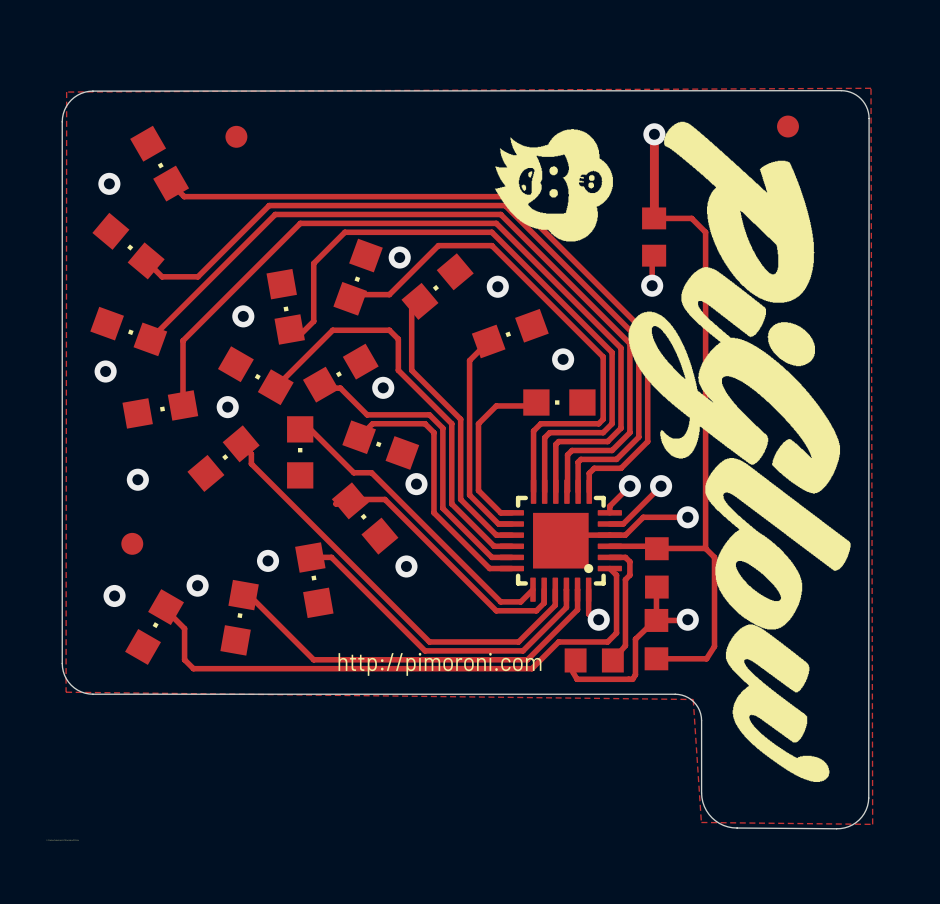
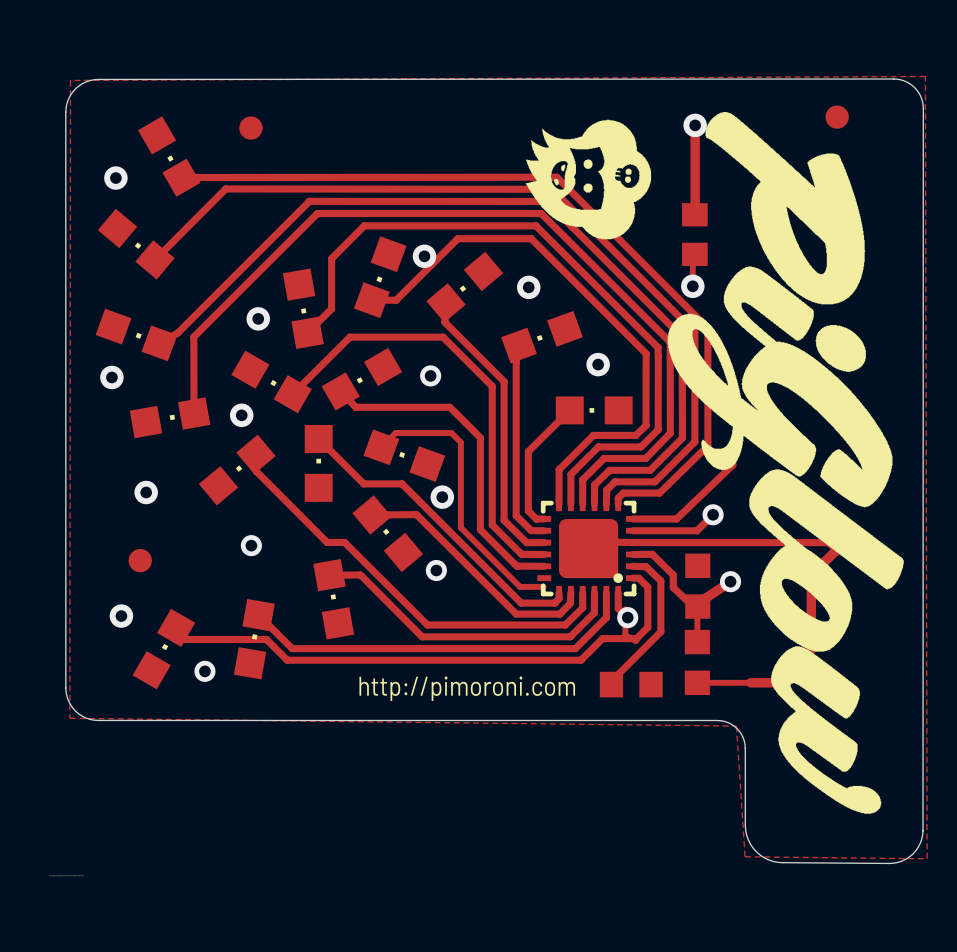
track: (171, 183) (184, 196) (509, 196) (647, 334) (647, 441) (621, 468) (594, 468) (589, 473) (589, 491) -> (181, 177) (177, 177) (556, 177) (707, 328) (707, 445) (659, 493) (623, 493) (618, 498) (618, 504)
track: (654, 218) (691, 218) (705, 232) (705, 548) -> none
track: (146, 260) (162, 276) (197, 276) (269, 205) (505, 205) (638, 339) (638, 437) (616, 459) (580, 459) (578, 462) (578, 491) -> (155, 259) (225, 188) (552, 189) (694, 332) (694, 441) (654, 481) (615, 481) (606, 490) (606, 504)
track: (350, 298) (354, 294) (389, 294) (438, 245) (491, 245) (603, 356) (603, 419) (598, 423) (540, 423) (533, 431) (533, 491) -> (371, 300) (396, 300) (457, 238) (531, 238) (646, 353) (646, 425) (635, 435) (593, 435) (559, 469) (559, 504)
track: (419, 301) (411, 309) (411, 370) (460, 419) (460, 499) (496, 535) (511, 535) -> (446, 302) (444, 322) (504, 381) (504, 520) (526, 542) (544, 542)
track: (289, 329) (294, 334) (300, 334) (313, 321) (313, 263) (344, 232) (491, 232) (612, 352) (612, 423) (603, 432) (549, 432) (544, 437) (544, 491) -> (307, 332) (331, 308) (331, 258) (364, 225) (535, 225) (658, 347) (658, 429) (641, 446) (598, 446) (593, 451)
track: (150, 339) (275, 214) (500, 214) (629, 343) (629, 432) (612, 450) (572, 450) (567, 454) (566, 491) -> (159, 343) (177, 333) (309, 201) (546, 201) (682, 337) (682, 438) (650, 470) (609, 470) (594, 485) (594, 504)
track: (488, 341) (469, 360) (469, 495) (498, 524) (511, 524) -> (519, 345) (516, 362) (516, 515) (531, 530) (544, 530)
via: none -> (430, 375)
track: (320, 384) (324, 388) (340, 388) (367, 414) (429, 414) (442, 428) (442, 508) (491, 557) (511, 557) -> (340, 391) (355, 407) (449, 407) (480, 437) (480, 529) (516, 566) (544, 566)
track: (275, 387) (332, 330) (389, 330) (398, 339) (398, 370) (451, 423) (451, 503) (494, 546) (511, 546) -> (292, 394) (349, 337) (443, 337) (492, 386) (492, 525) (521, 554) (544, 554)
via: (383, 387) -> none
track: (536, 402) (532, 405) (496, 405) (478, 423) (478, 490) (500, 512) (511, 512) -> (569, 410) (528, 451) (528, 510) (536, 519) (544, 518)
track: (183, 405) (183, 340) (300, 223) (496, 223) (621, 348) (621, 428) (607, 441) (558, 441) -> (193, 413) (193, 336) (317, 213) (541, 213) (670, 342) (670, 433) (645, 458) (604, 458) (582, 479) (582, 504)
track: (300, 429) (310, 429) (353, 472) (371, 472) (500, 601) (520, 601) (533, 589) -> (318, 438) (363, 483) (402, 483) (521, 603) (554, 603) (559, 598) (559, 592)
track: (241, 443) (251, 454) (251, 463) (429, 641) (518, 641) (555, 605) (555, 589) -> (255, 454) (256, 471) (327, 542) (344, 542) (427, 625) (565, 625) (582, 607) (582, 592)
track: (555, 444) (555, 491) -> (590, 454) (570, 474) (570, 504)
track: none -> (733, 464) (676, 518) (632, 518)
part footprint: [499, 479, 622, 602] -> [537, 497, 640, 600]
track: (629, 486) (609, 506) (609, 512) -> none
via: (629, 486) -> none
track: (661, 486) (623, 524) (609, 524) -> none
via: (661, 486) -> none
track: (350, 500) (347, 503) (335, 503) (340, 499) (384, 499) (496, 610) (536, 610) (544, 603) (544, 589) -> (372, 514) (416, 514) (516, 614) (559, 614) (570, 603) (570, 592)
track: none -> (713, 514) (697, 530) (632, 530)
via: none -> (713, 514)
track: (687, 517) (643, 517) (625, 535) (566, 535) (560, 540) -> none
via: (687, 517) -> none
via: none -> (251, 545)
track: none -> (632, 554) (652, 554) (673, 575) (673, 587) (693, 606) (730, 581)
track: (609, 546) (705, 548) -> none
track: (705, 548) (714, 557) (714, 646) (706, 658) -> (588, 548) (606, 541) (828, 542) (836, 550) (811, 574) (811, 649) (777, 682) (750, 682)
track: none -> (632, 566) (646, 566) (660, 580) (660, 631) (610, 682)
track: (310, 557) (331, 557) (425, 650) (523, 650) (566, 607) (566, 589) -> (329, 575) (360, 575) (422, 636) (570, 636) (594, 612) (594, 592)
track: (609, 557) (625, 557) (629, 561) (629, 575) (625, 579) (625, 645) (612, 660) -> none
via: (268, 560) -> none
via: none -> (730, 581)
via position: (406, 566) -> (436, 570)
track: (609, 568) (616, 575) (616, 633) (607, 641) (558, 641) (531, 668) (193, 668) (184, 659) (184, 628) (166, 610) (166, 607) -> (632, 578) (638, 578) (647, 587) (647, 627) (636, 638) (602, 638) (580, 660) (287, 660) (266, 639) (185, 639) (176, 627)
track: none -> (618, 592) (618, 608) (627, 617)
via: (197, 585) -> none
track: (577, 589) (577, 609) (527, 659) (313, 659) (249, 595) (243, 595) -> (606, 592) (606, 617) (575, 648) (292, 648) (258, 615)
via: none -> (627, 617)
via: (598, 619) -> none
track: (687, 619) (655, 619) (635, 639) (635, 674) (632, 679) (577, 679) (573, 672) (573, 659) (575, 660) -> none
via: (687, 619) -> none
via: none -> (204, 671)

